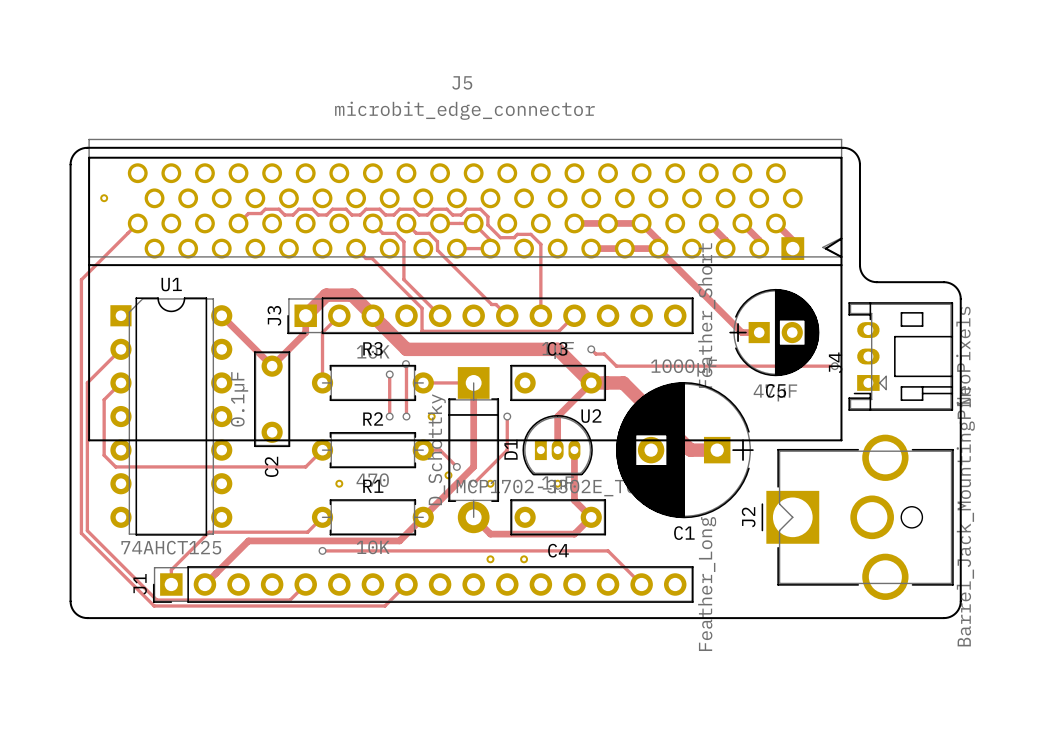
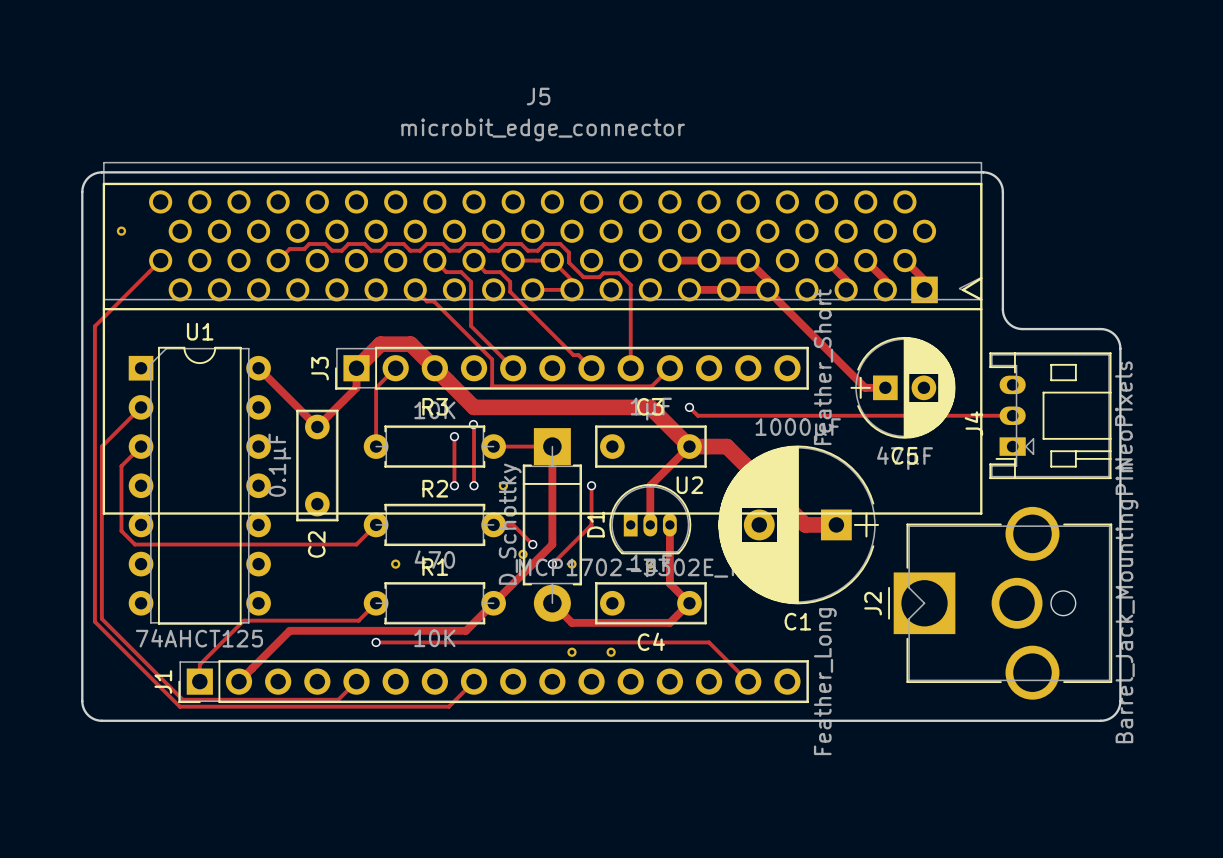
track: (595, 354) (604, 354) (616, 366) (834, 366) -> (694, 412) (697, 415) (1012, 415)
via: (834, 366) -> none

